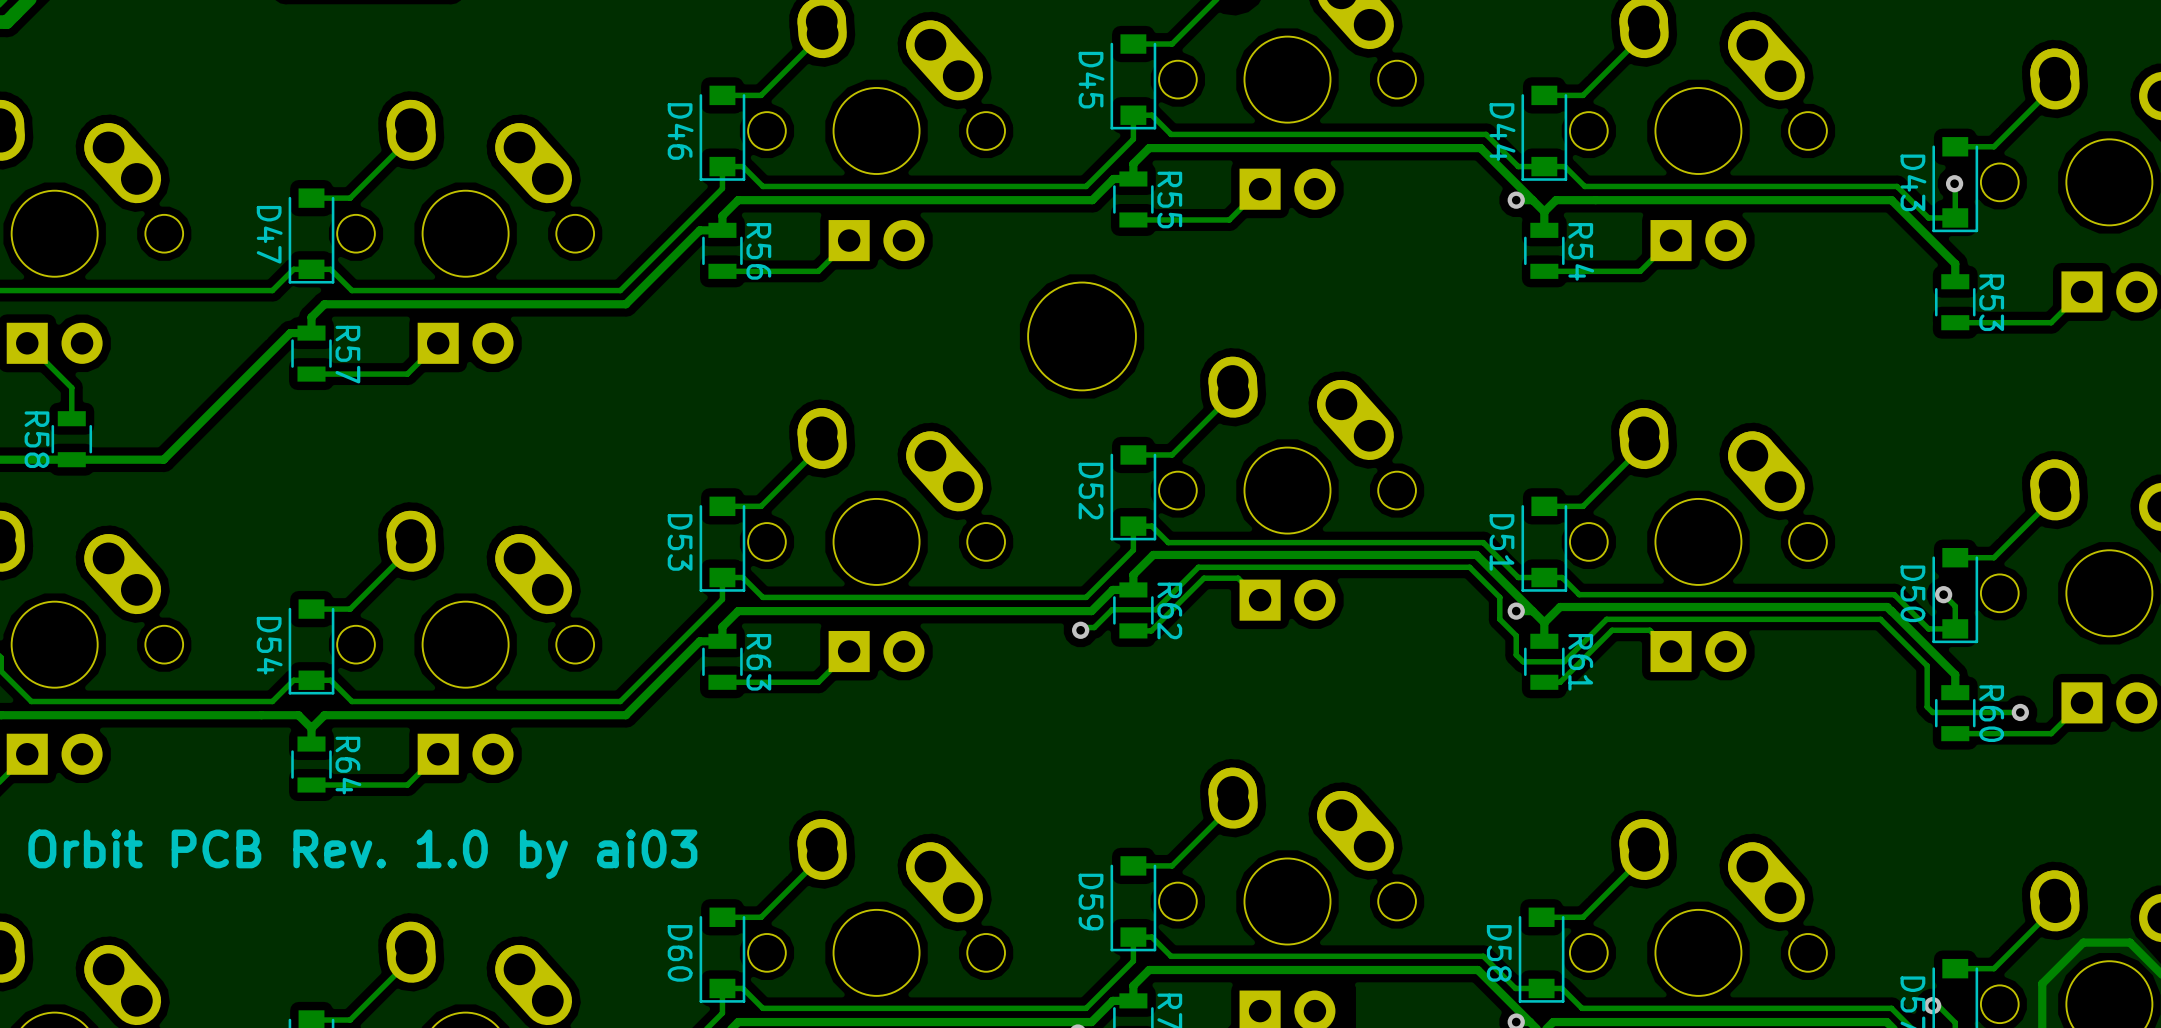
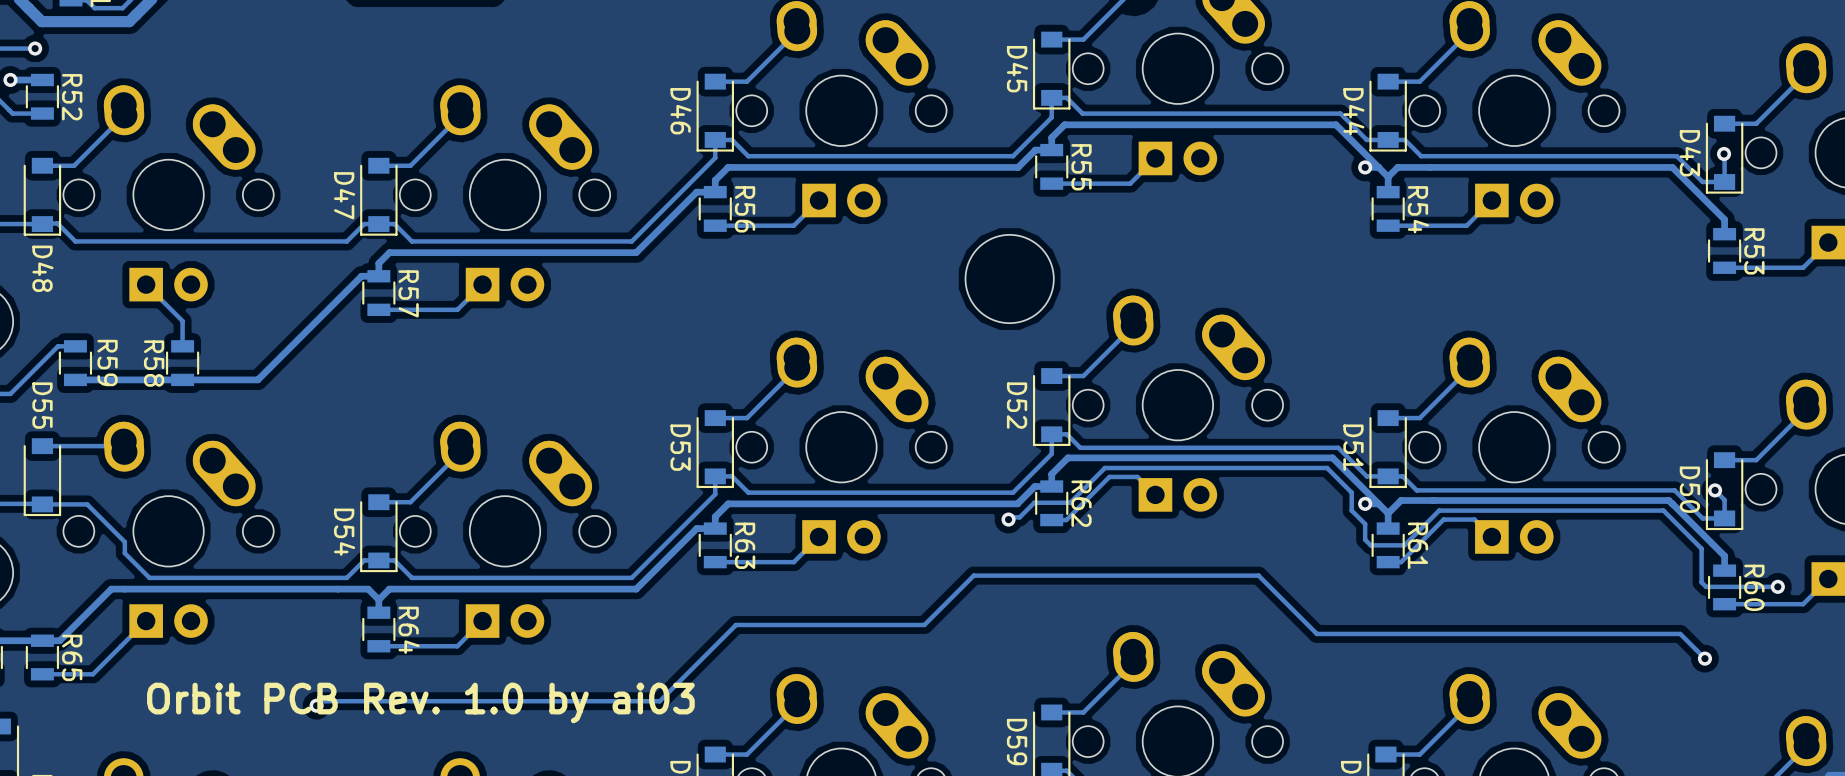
track: none -> (1704, 658) (1680, 633) (1316, 633) (1258, 575) (973, 575) (924, 624) (736, 624) (659, 701) (321, 701) (316, 705)
via: none -> (1704, 658)
via: none -> (316, 705)

